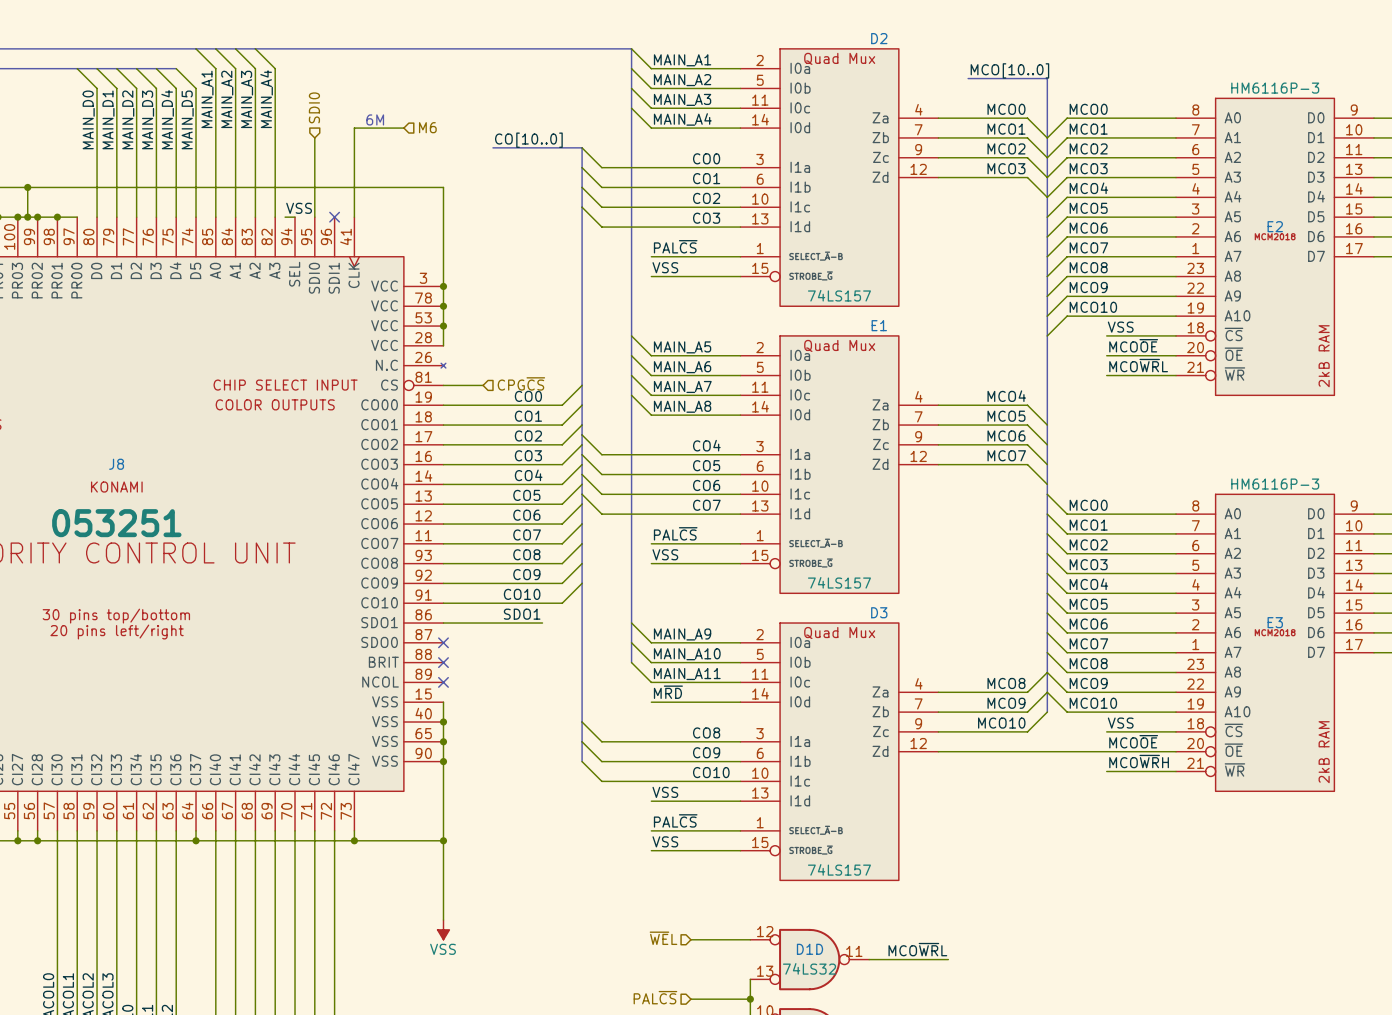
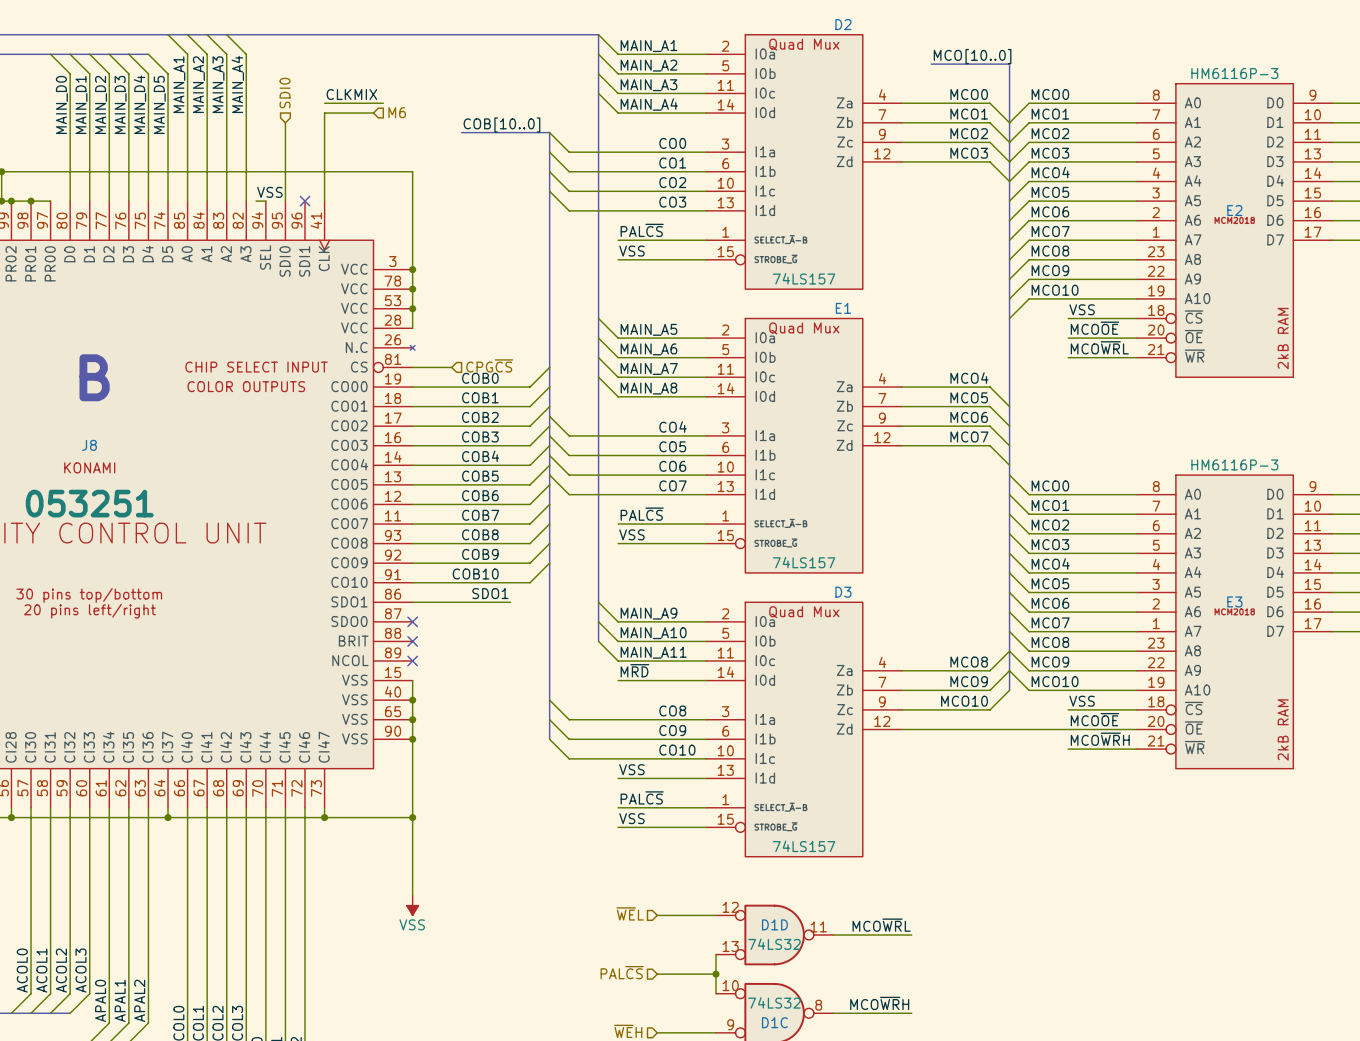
label: none -> CLKMIX (351, 94)
wire: none -> (324, 103) (383, 103)
text: 6M (375, 119) -> none
label: CO[10..0] (528, 140) -> COB[10..0] (501, 125)
text: none -> B (94, 377)
label: CO0 (528, 396) -> COB0 (480, 378)
label: CO1 (528, 416) -> COB1 (480, 397)
label: CO2 (528, 435) -> COB2 (480, 417)
label: CO3 (528, 455) -> COB3 (480, 437)
label: CO4 (528, 475) -> COB4 (480, 456)
label: CO5 (526, 495) -> COB5 (480, 476)
label: CO6 (526, 515) -> COB6 (480, 495)
label: CO7 (527, 534) -> COB7 (480, 515)
label: CO8 (526, 554) -> COB8 (480, 534)
label: CO9 (526, 574) -> COB9 (480, 554)
label: CO10 (522, 594) -> COB10 (475, 573)

